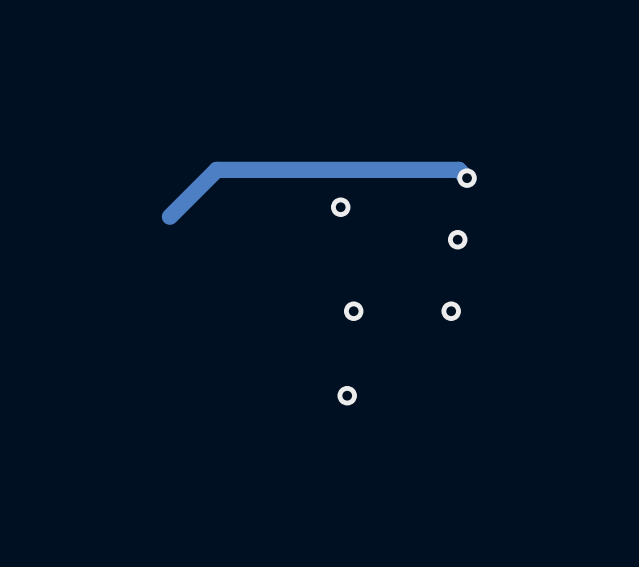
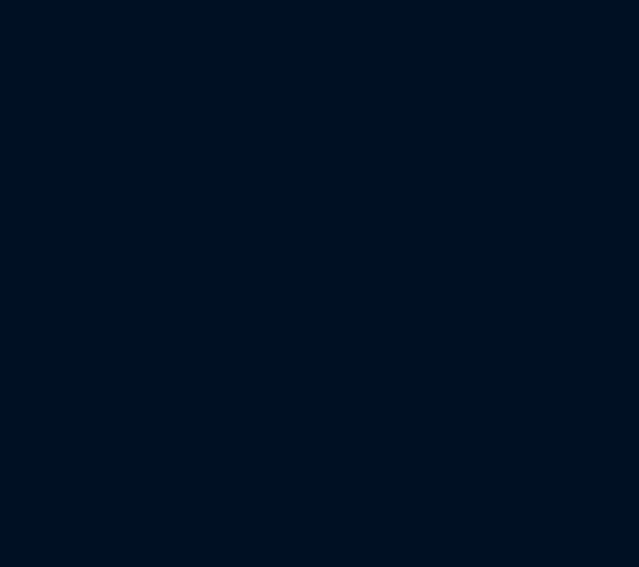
track: (467, 178) (458, 169) (216, 169) (169, 216) -> none
via: (467, 178) -> none
via: (340, 207) -> none
via: (457, 239) -> none
via: (353, 311) -> none
via: (451, 311) -> none
via: (347, 395) -> none

